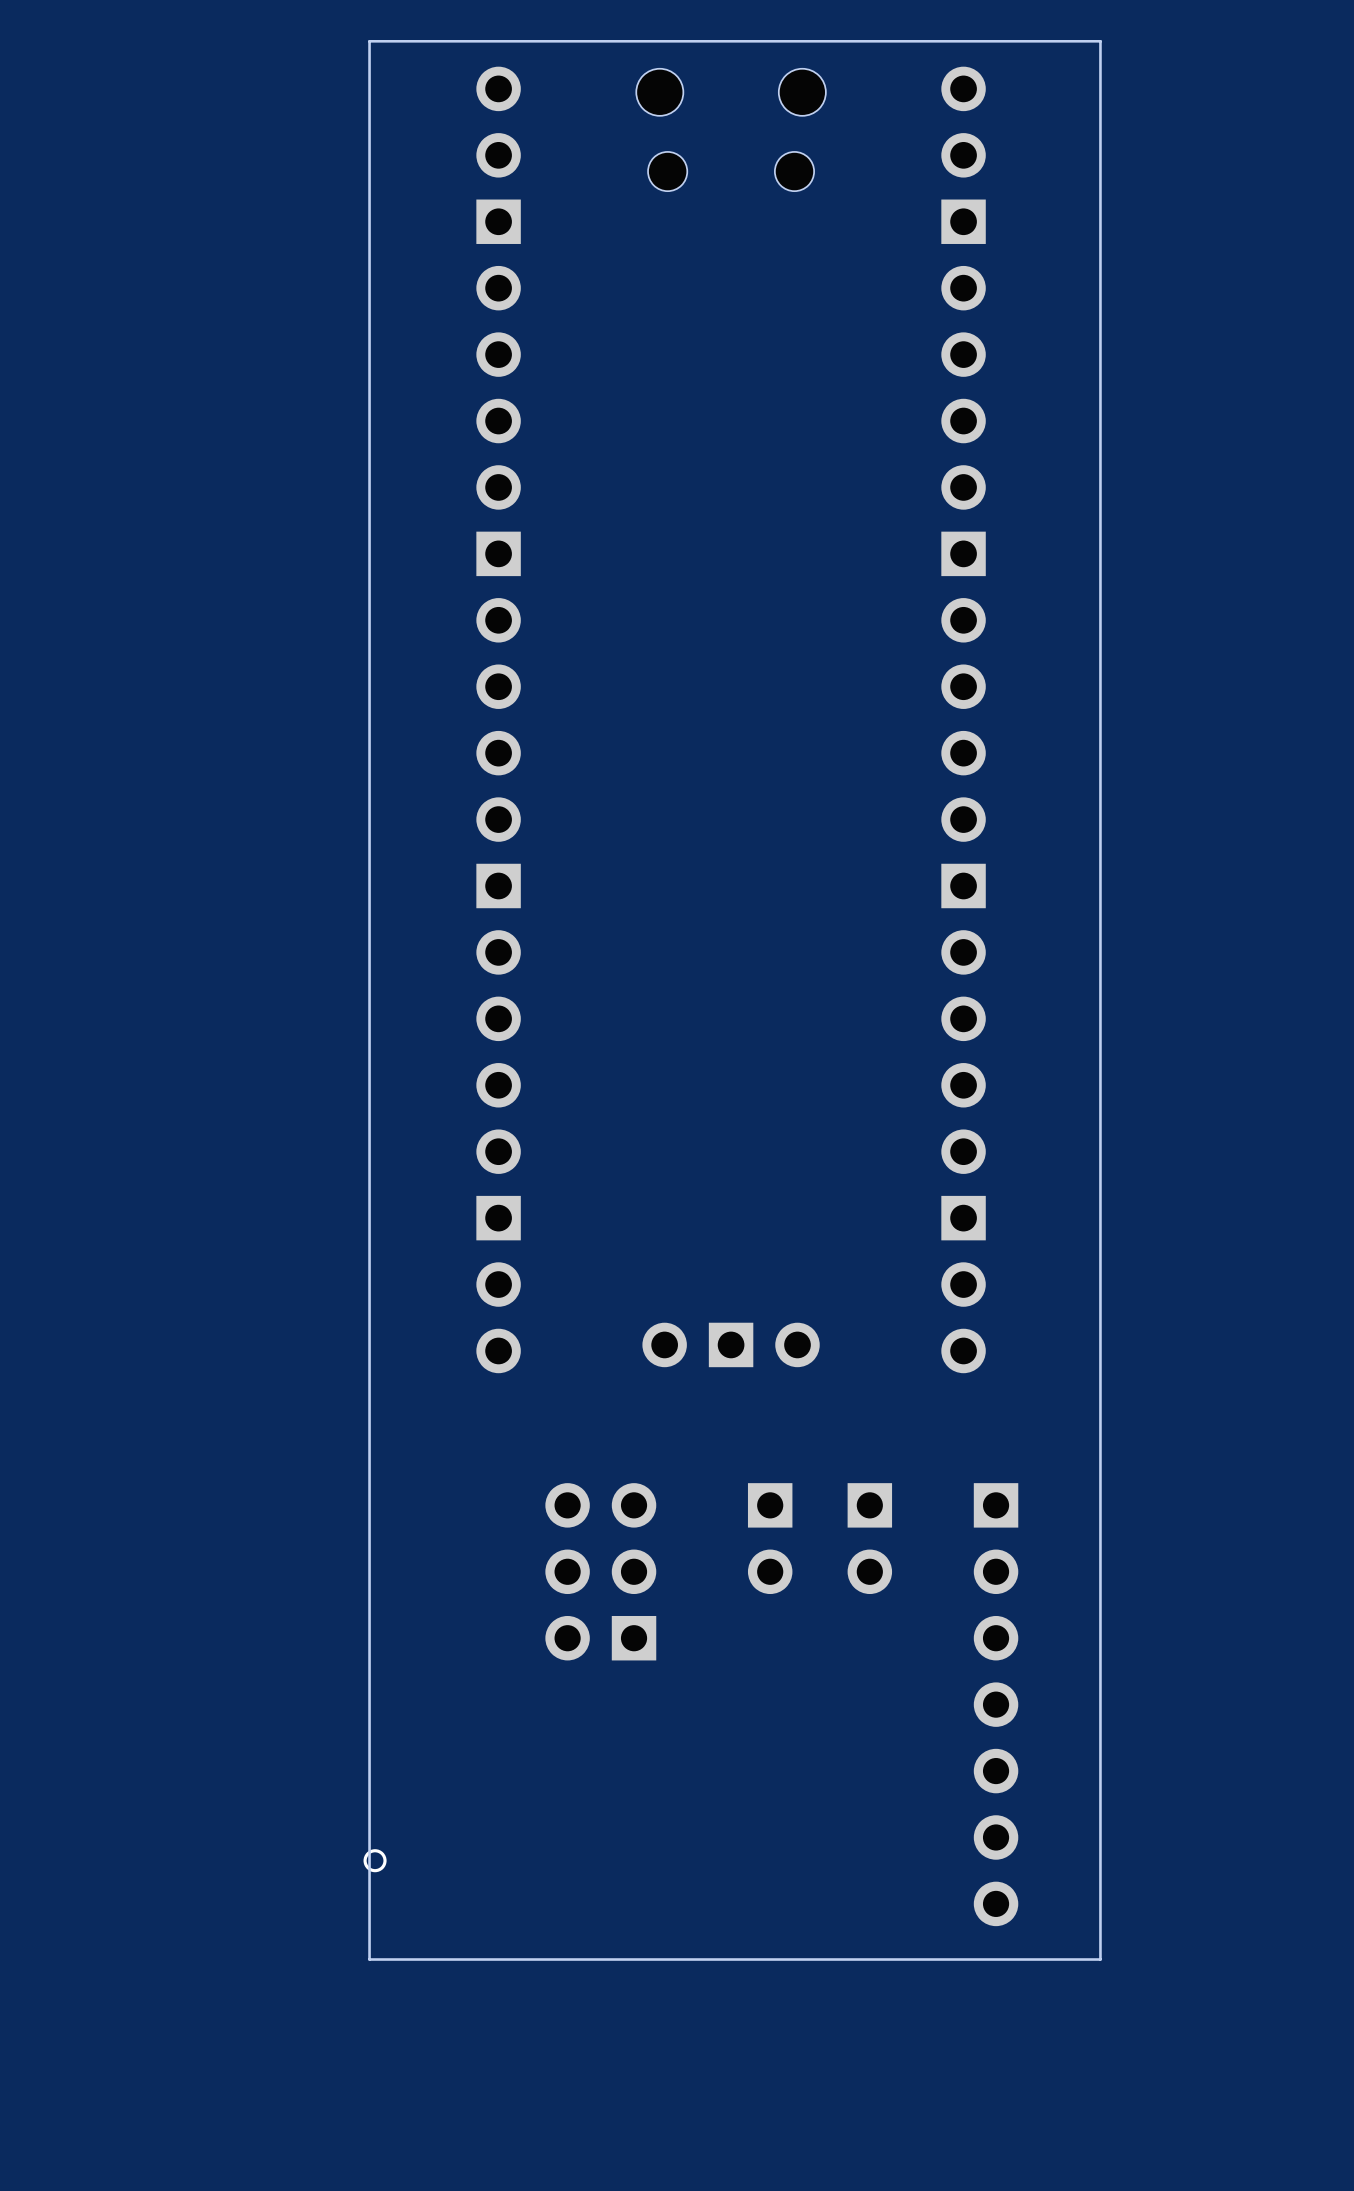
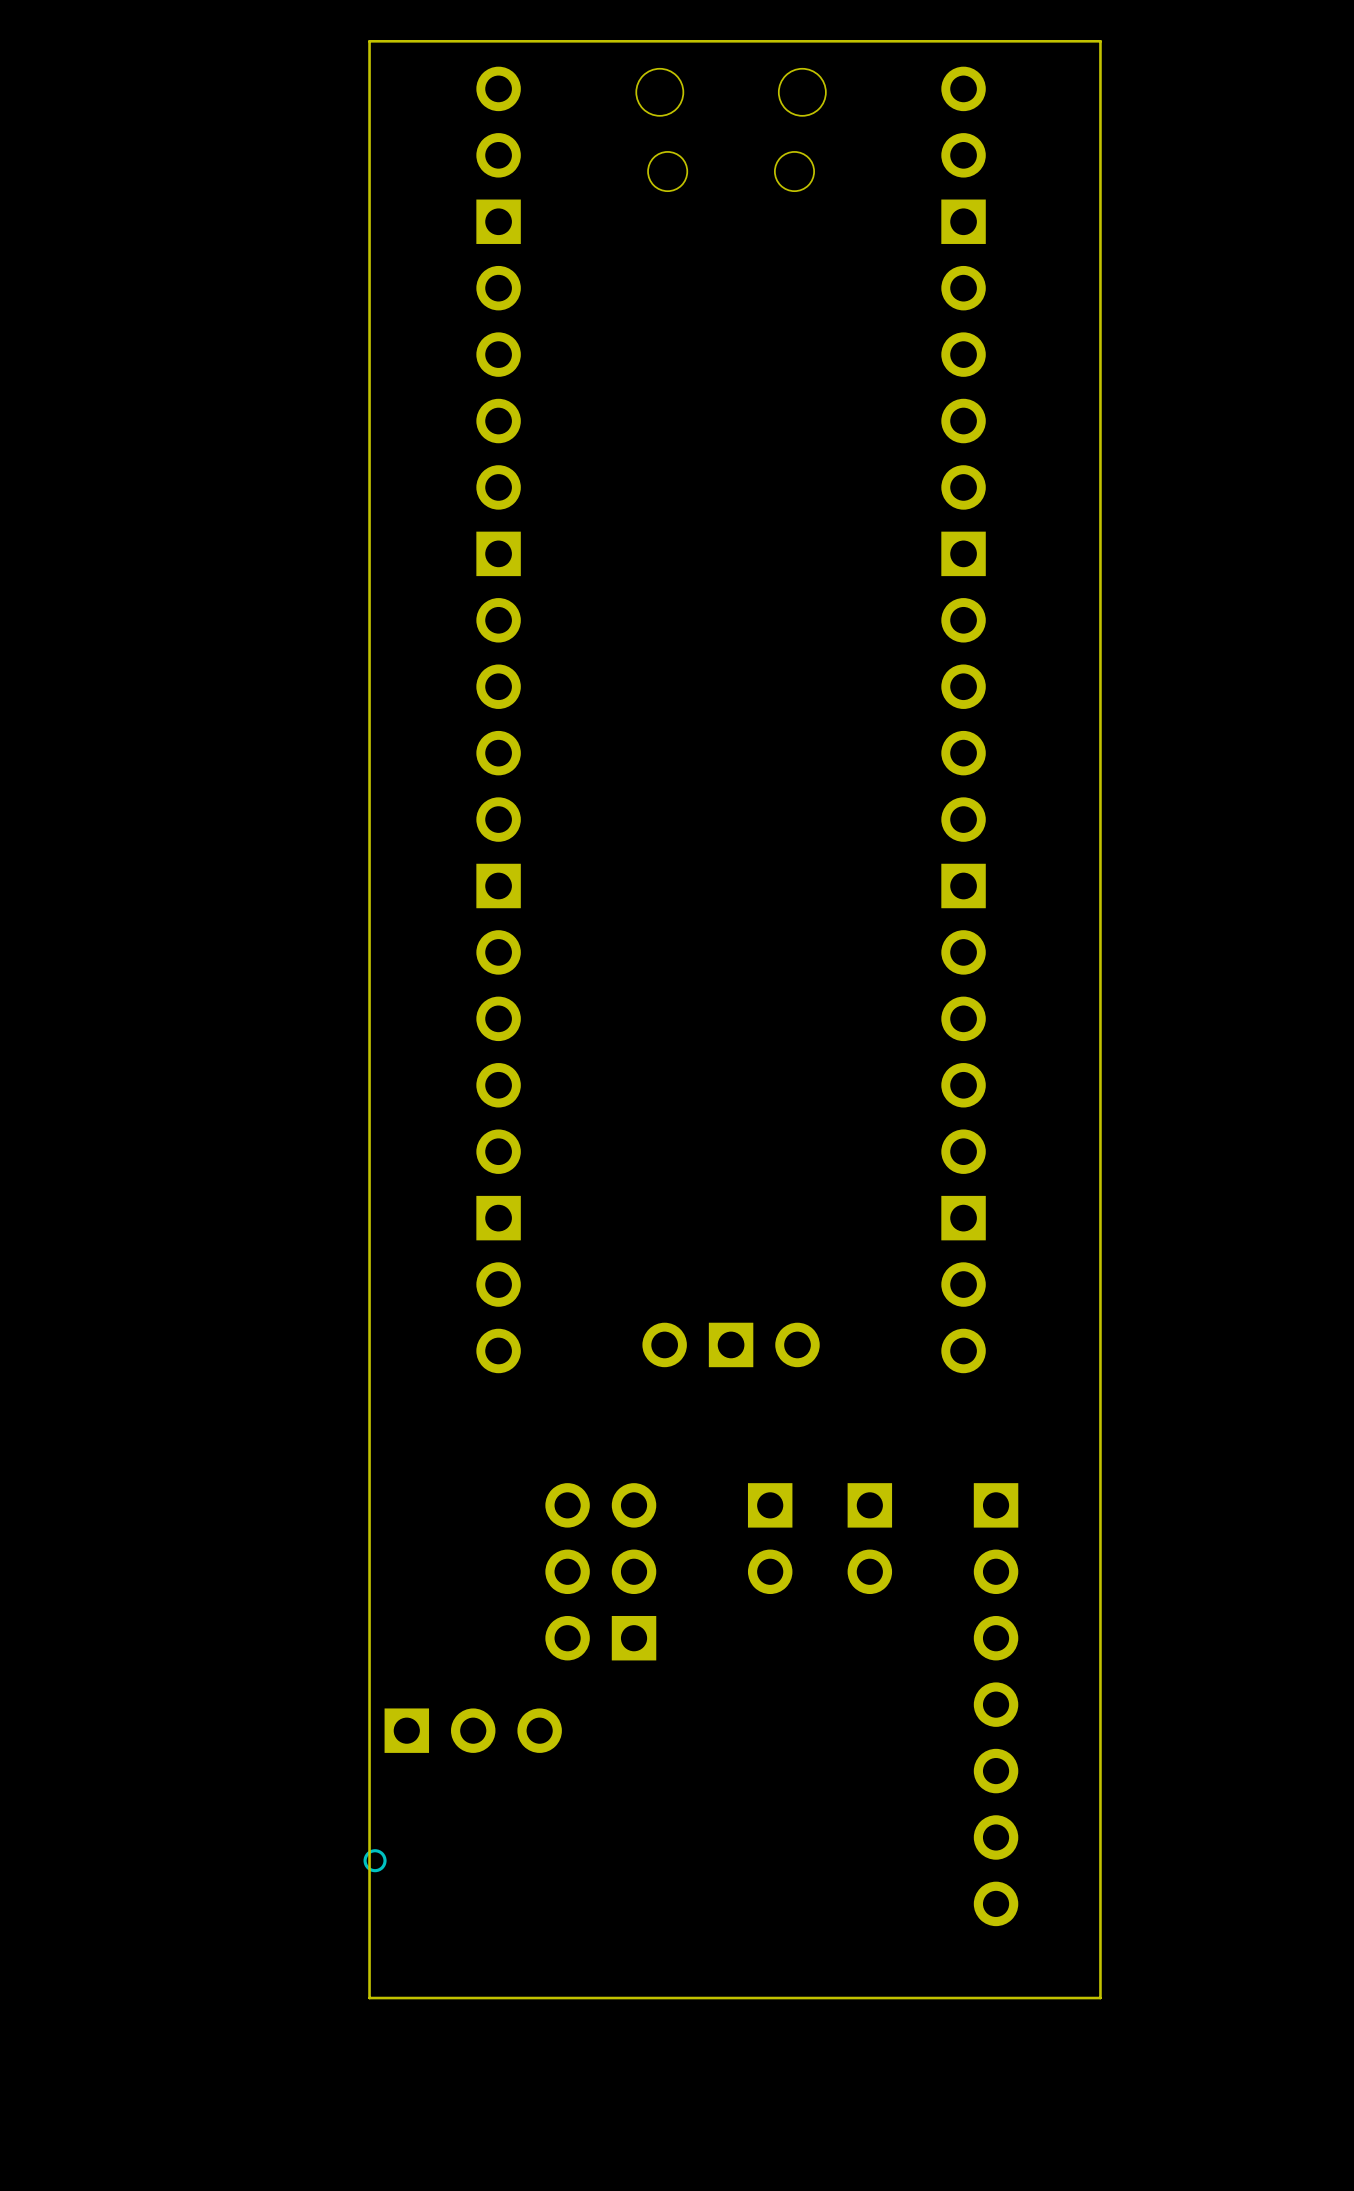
part: none -> (473, 1730)
board edge: (1100, 1959) (369, 1959) -> (1100, 1959) (1100, 1998) (369, 1998) (369, 1959)

